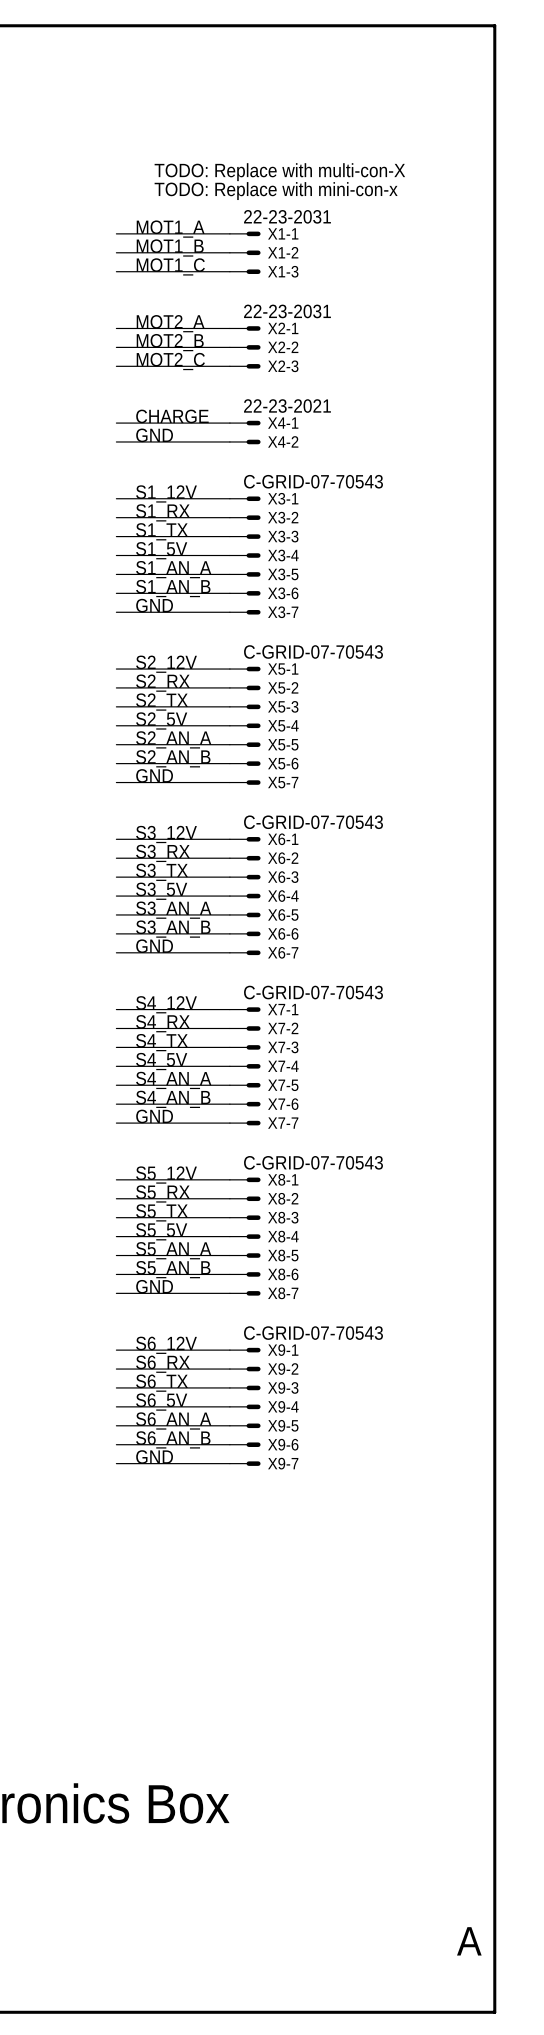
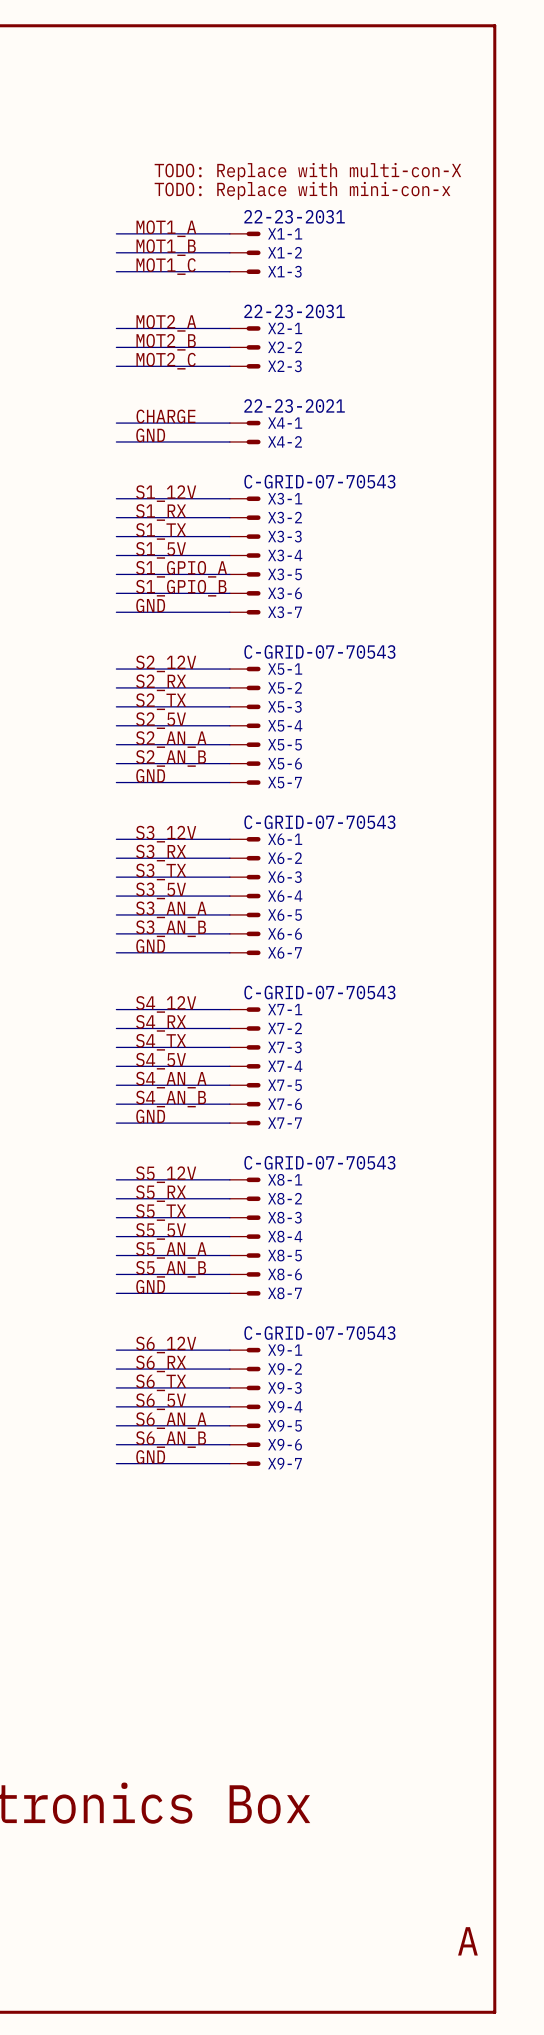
label: S1_AN_A (173, 569) -> S1_GPIO_A (181, 569)
label: S1_AN_B (173, 588) -> S1_GPIO_B (181, 588)

